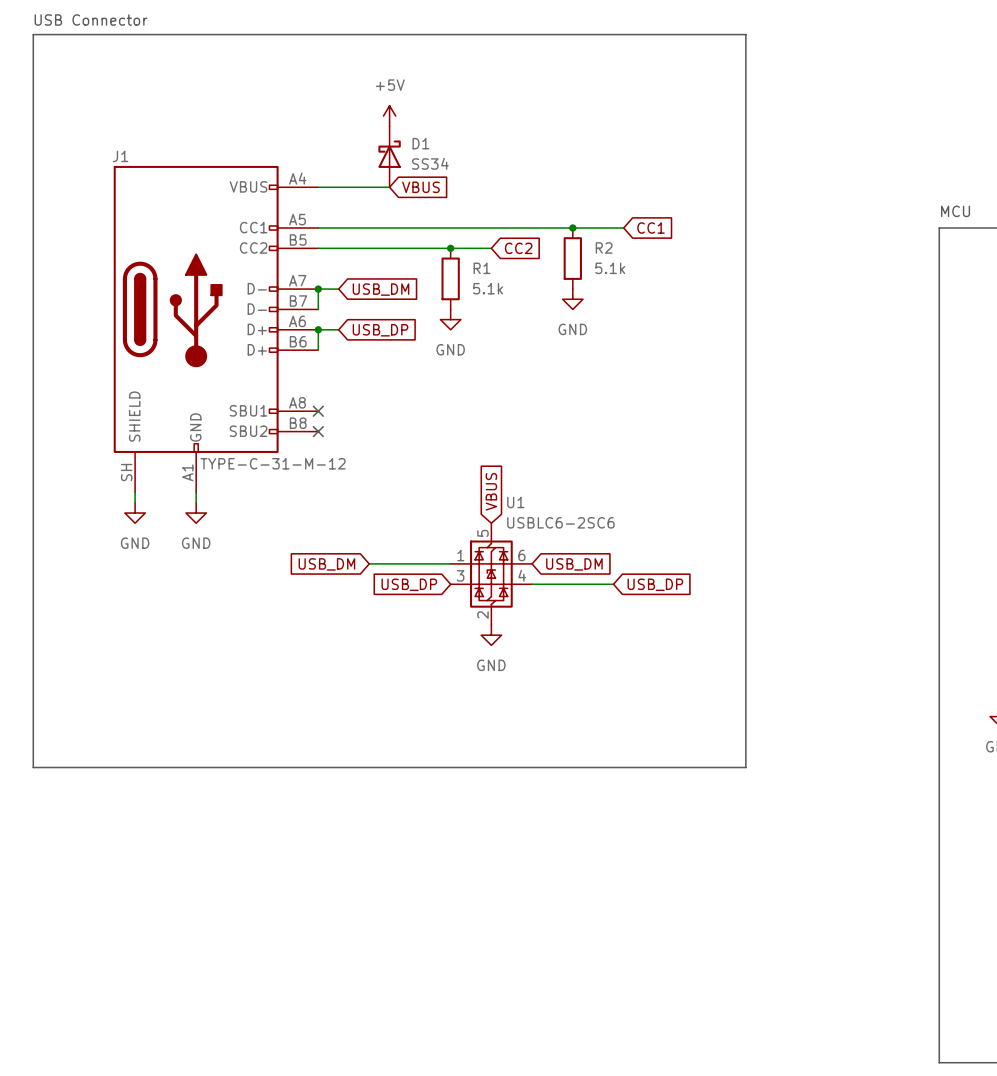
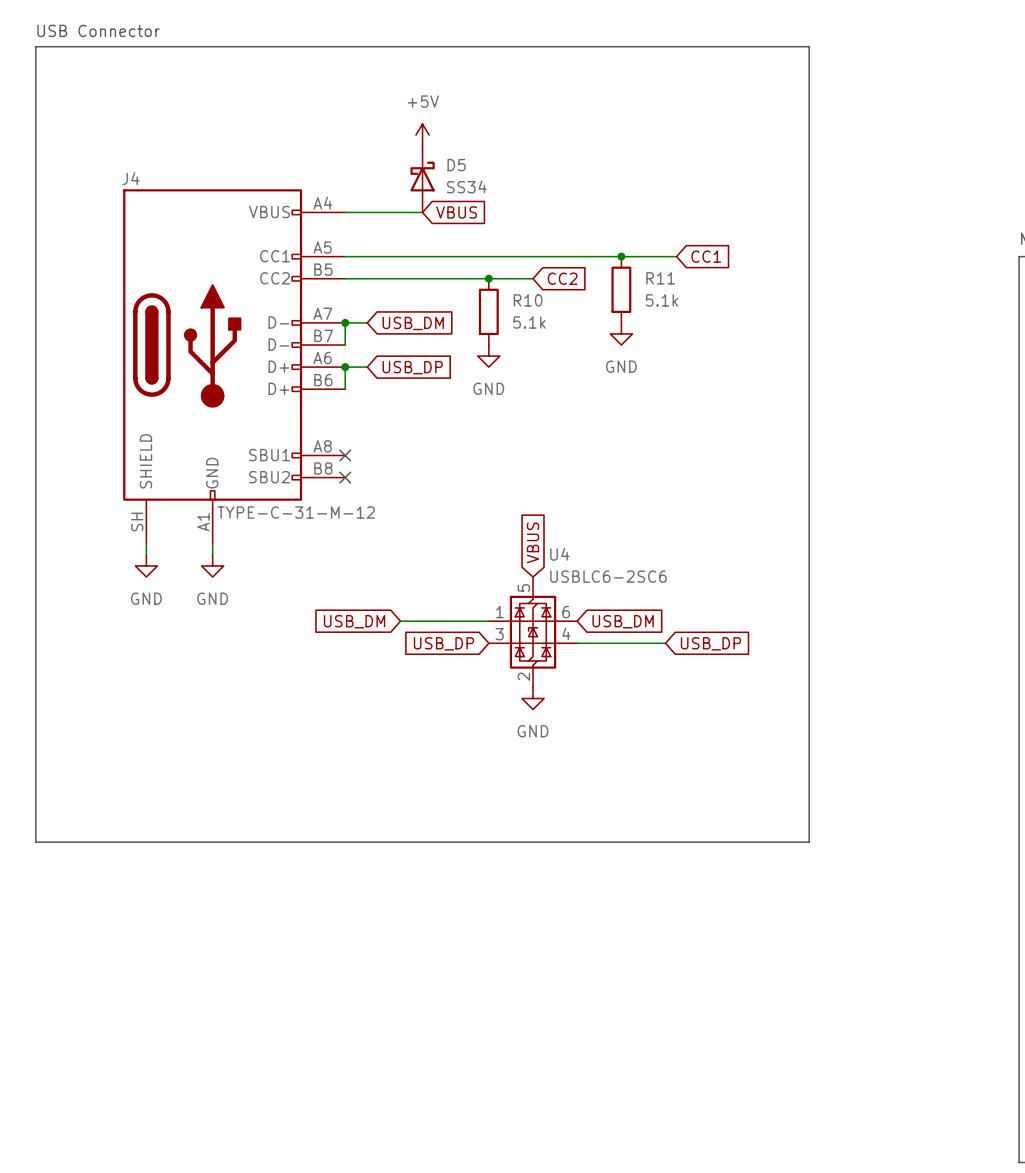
D1 name: D1 (420, 143) -> D5 (456, 165)
J1 name: J1 (120, 156) -> J4 (130, 178)
R2 name: R2 (604, 247) -> R11 (660, 278)
R1 name: R1 (482, 268) -> R10 (528, 300)
U1 name: U1 (515, 502) -> U4 (559, 554)

